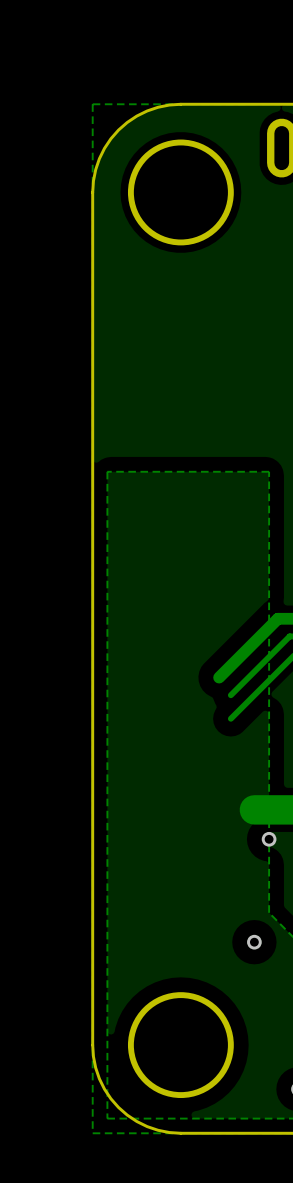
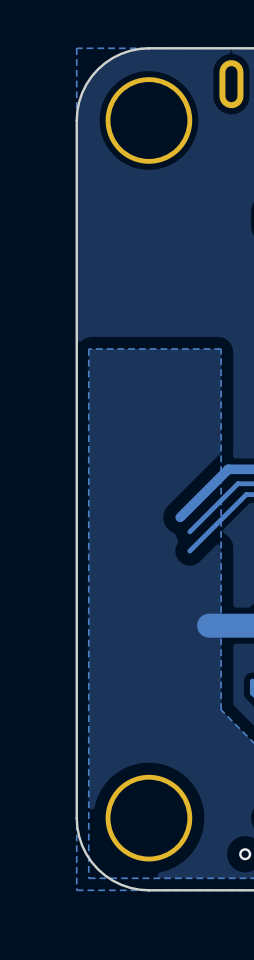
via: (269, 839) -> none
via: (254, 942) -> none

